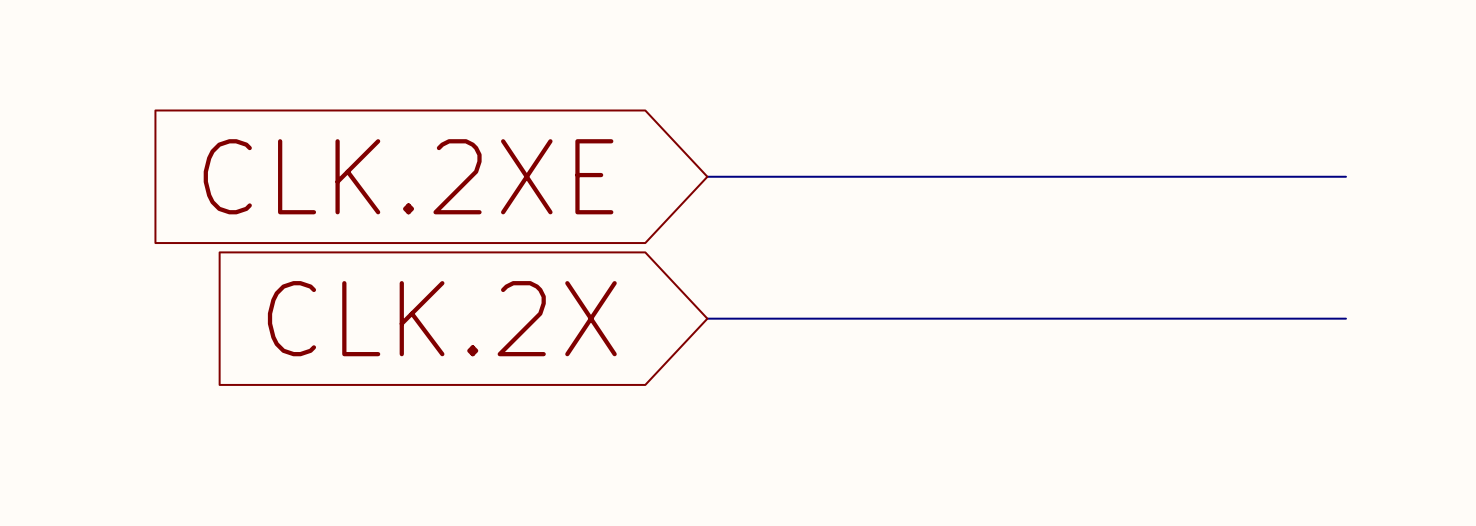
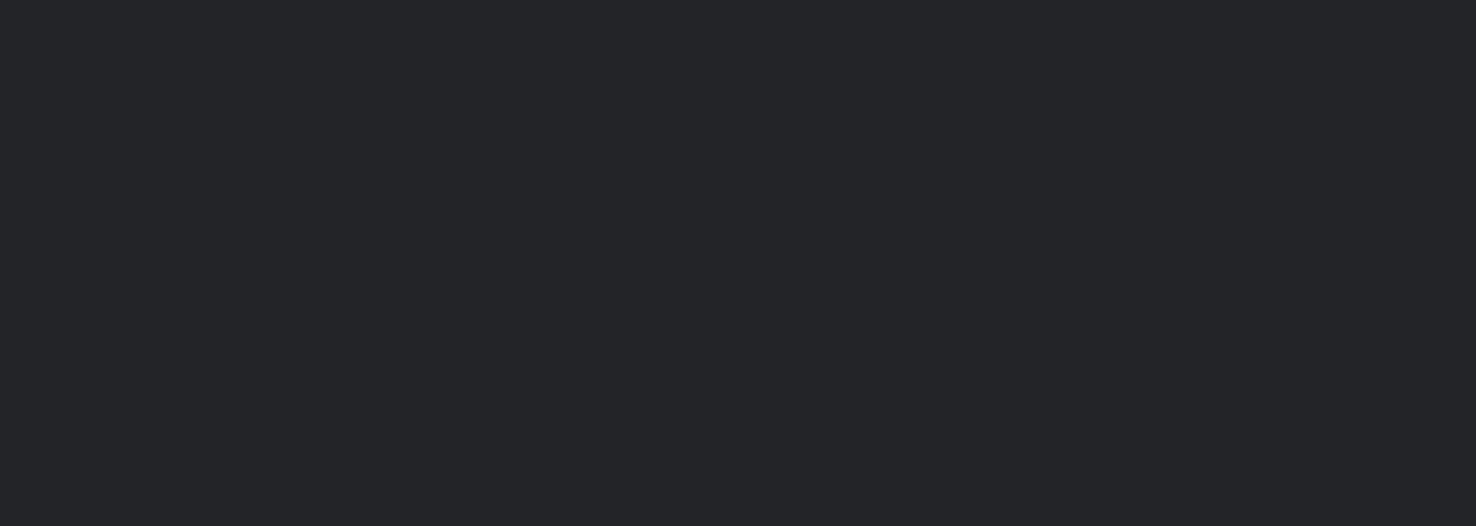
global label: CLK.2XE (408, 176) -> none
wire: (707, 176) (1345, 176) -> none
global label: CLK.2X (442, 318) -> none
wire: (707, 318) (1345, 318) -> none

